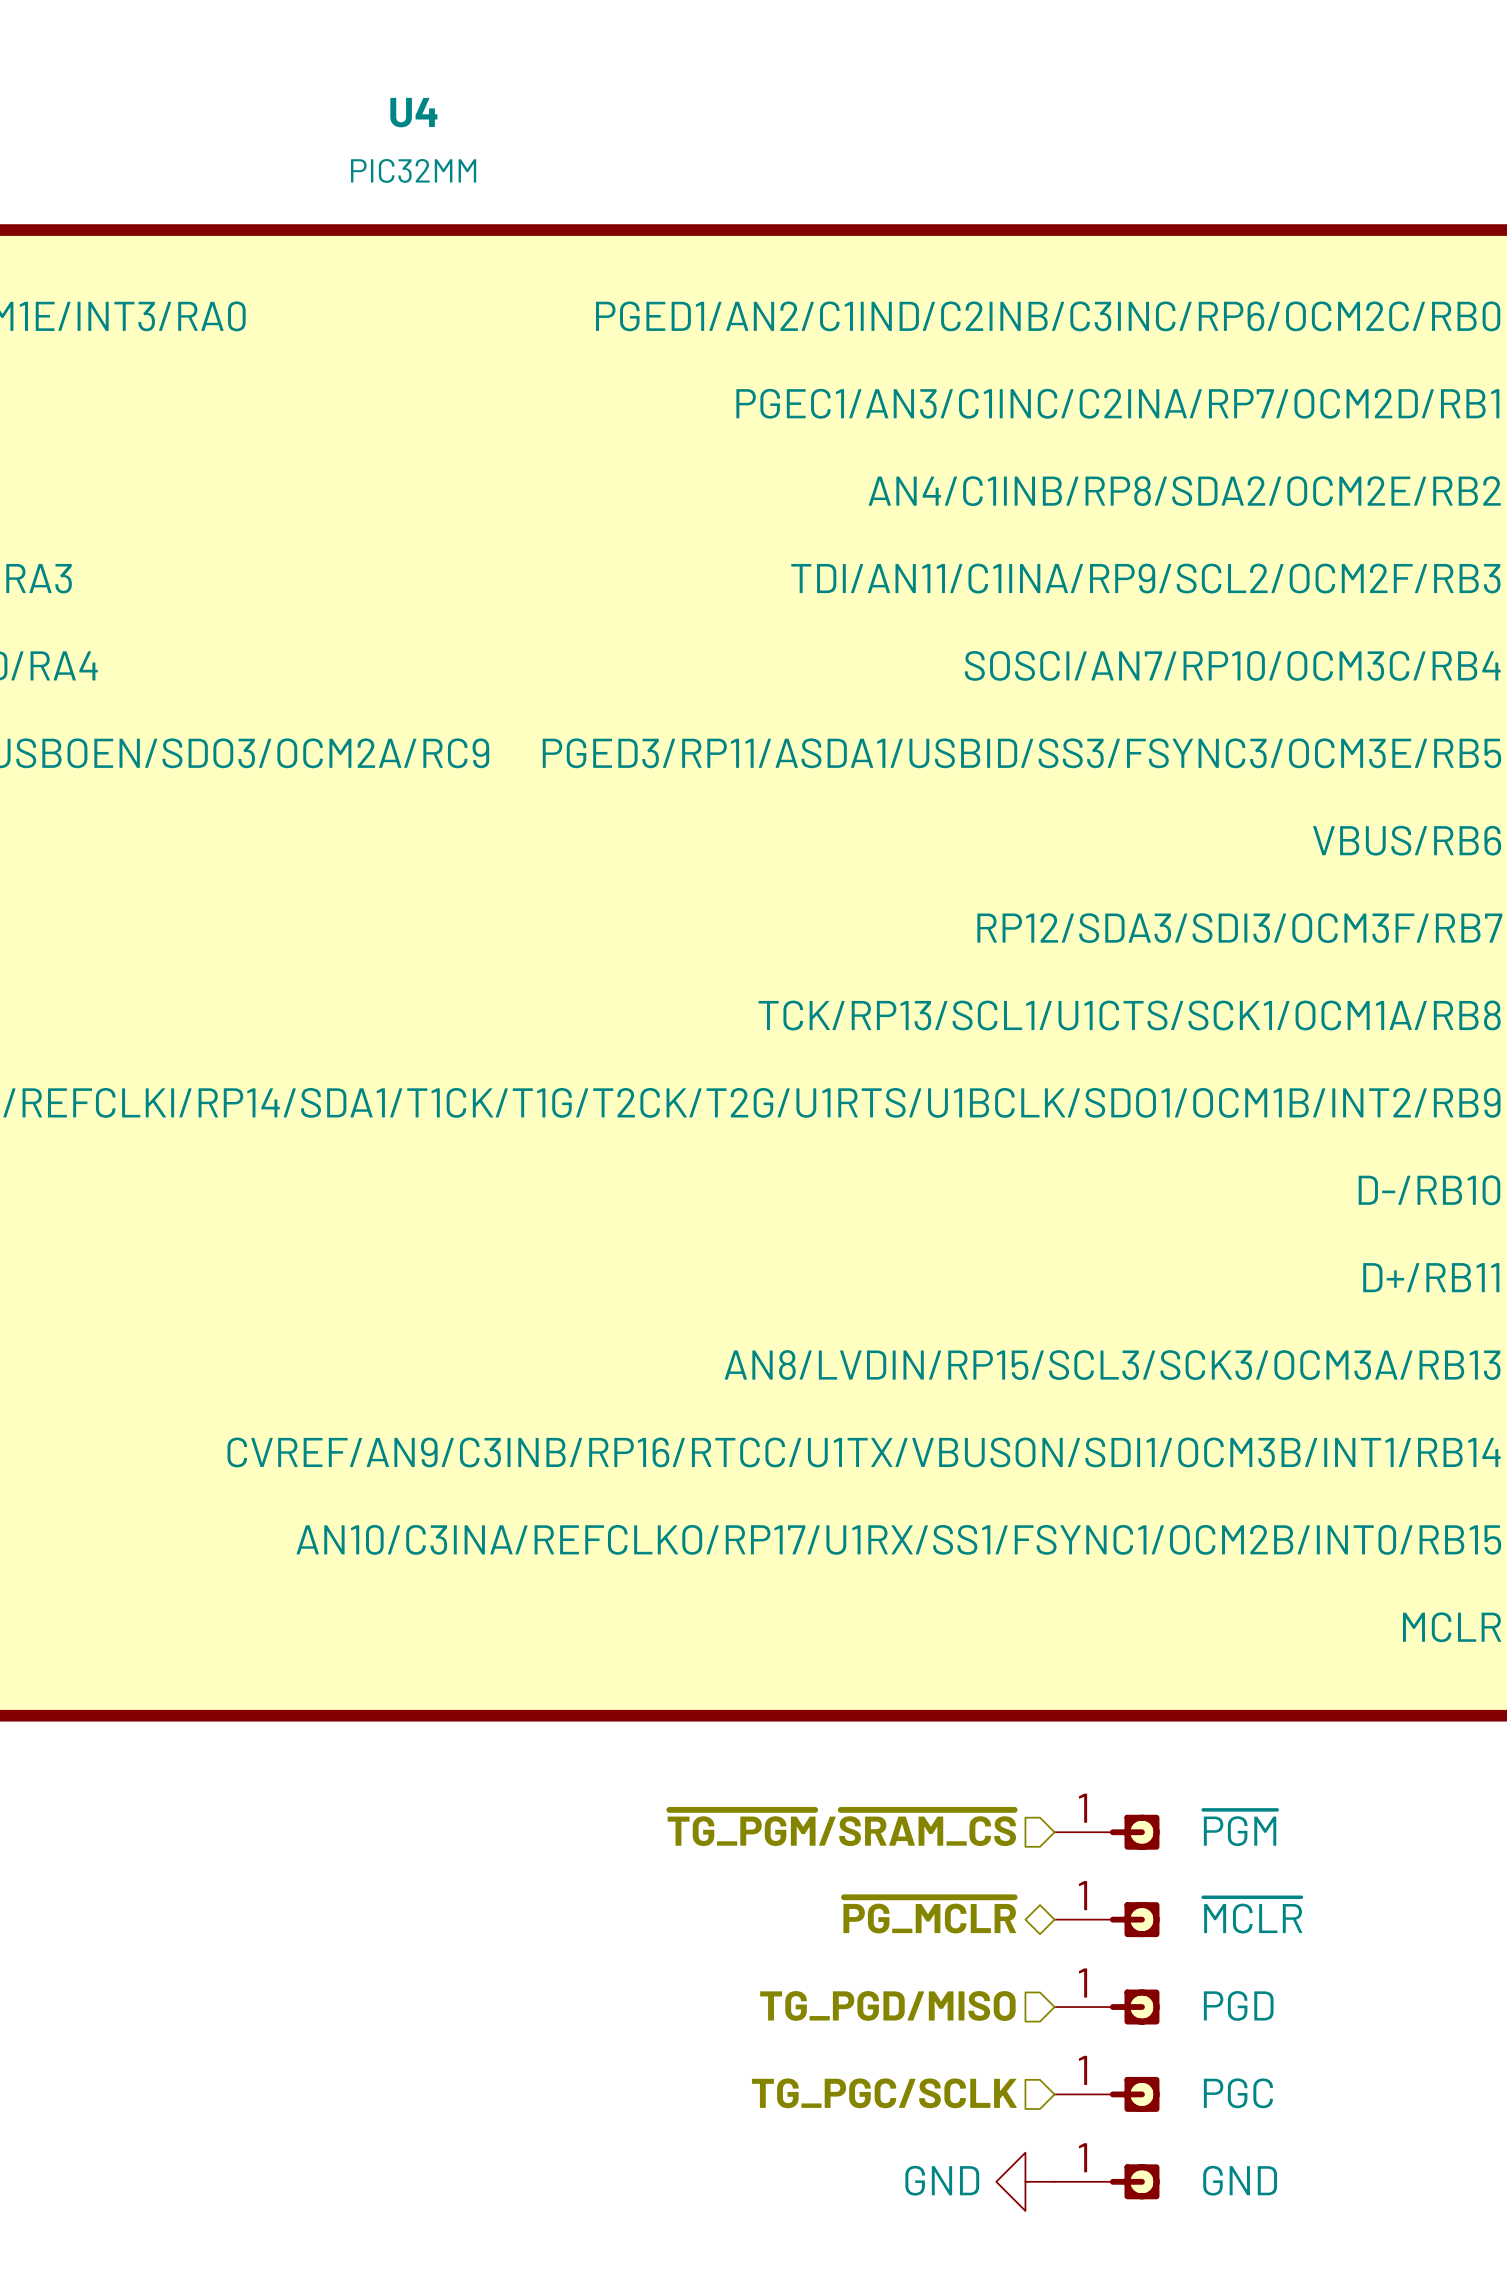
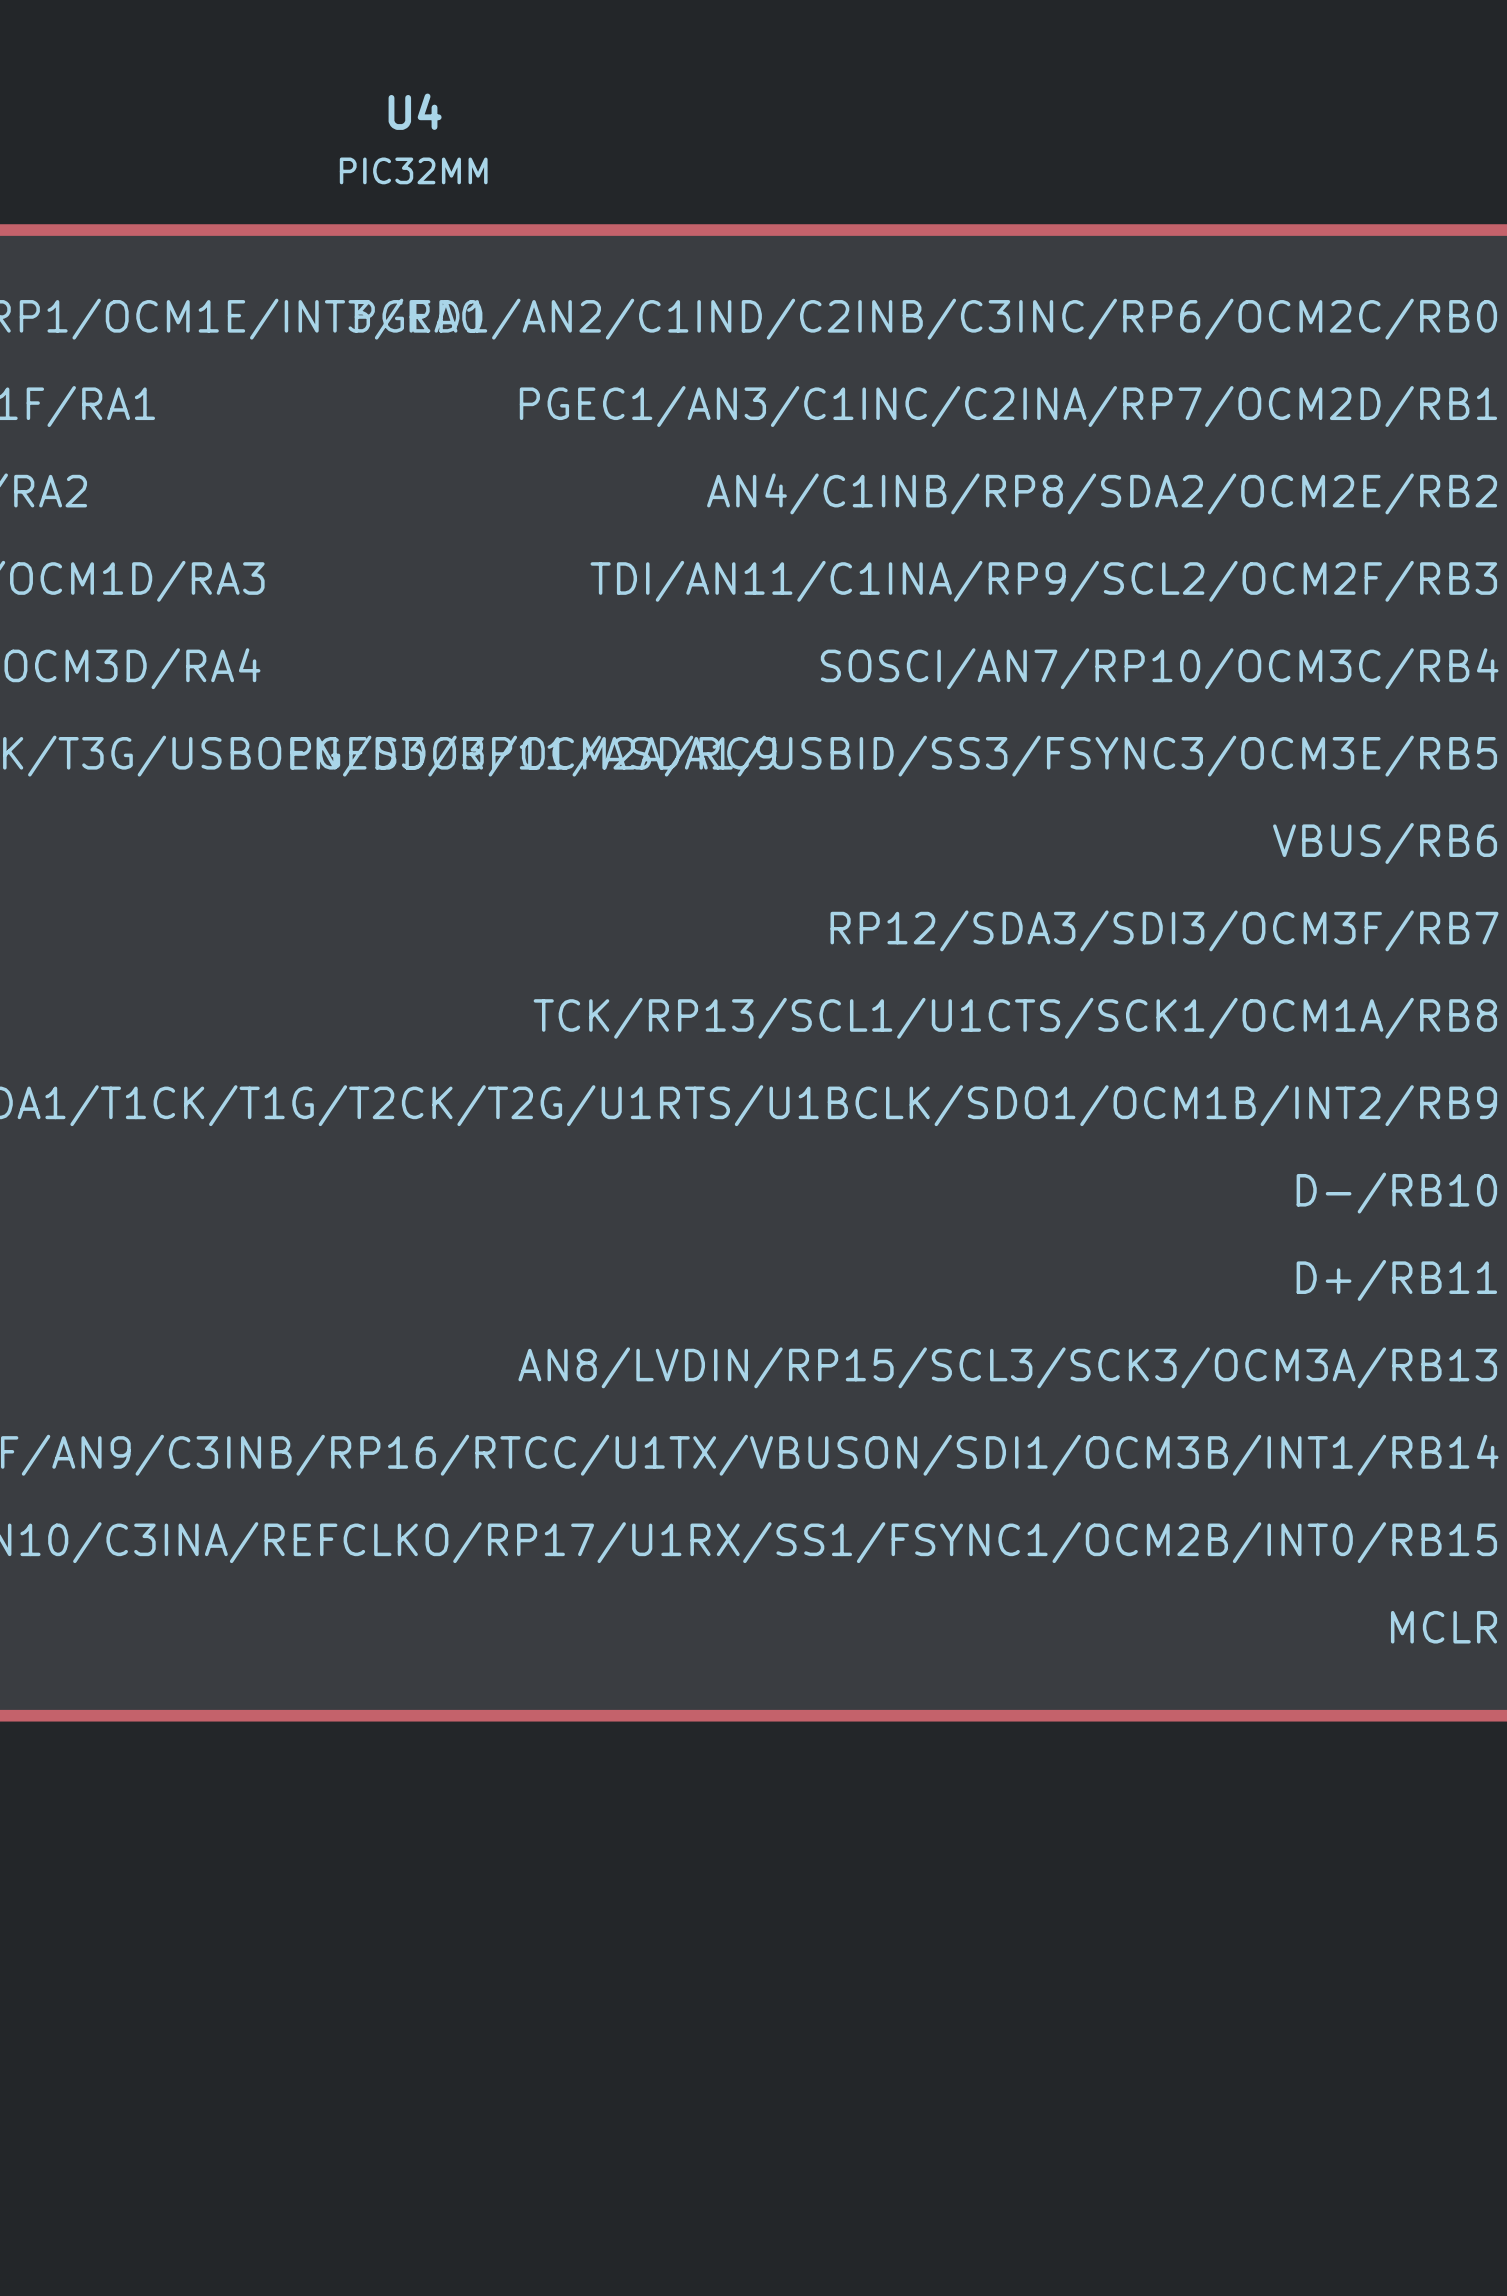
hierarchical label: ~{TG_PGM}/~{SRAM_CS} (841, 1827) -> none
part: ~{PGM} (1107, 1832) -> none
hierarchical label: ~{PG_MCLR} (929, 1915) -> none
part: ~{MCLR} (1107, 1919) -> none
hierarchical label: TG_PGD/MISO (887, 2006) -> none
part: PGD (1107, 2007) -> none
hierarchical label: TG_PGC/SCLK (884, 2093) -> none
part: PGC (1107, 2094) -> none
power symbol: GND (1025, 2181) -> none
part: GND (1107, 2181) -> none

